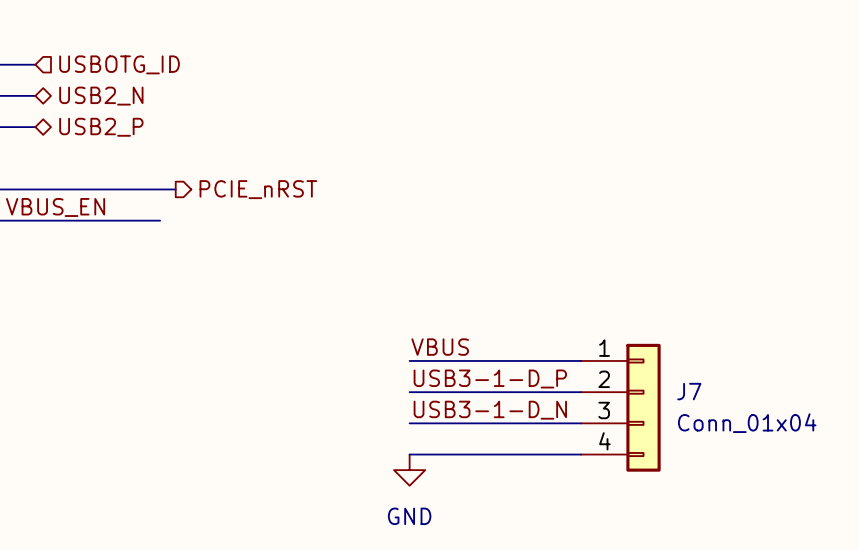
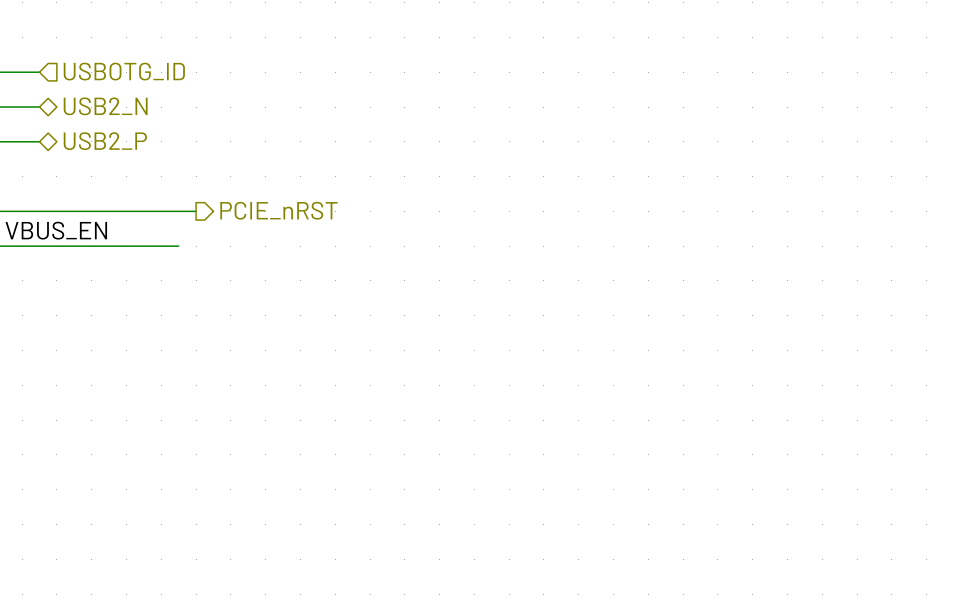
label: VBUS (440, 347) -> none
wire: (409, 360) (581, 360) -> none
label: USB3-1-D_P (490, 379) -> none
wire: (409, 392) (581, 392) -> none
J7: Conn_01x04 (620, 407) -> none
label: USB3-1-D_N (490, 410) -> none
wire: (409, 423) (581, 423) -> none
wire: (409, 454) (581, 454) -> none
power symbol: GND (409, 470) -> none

